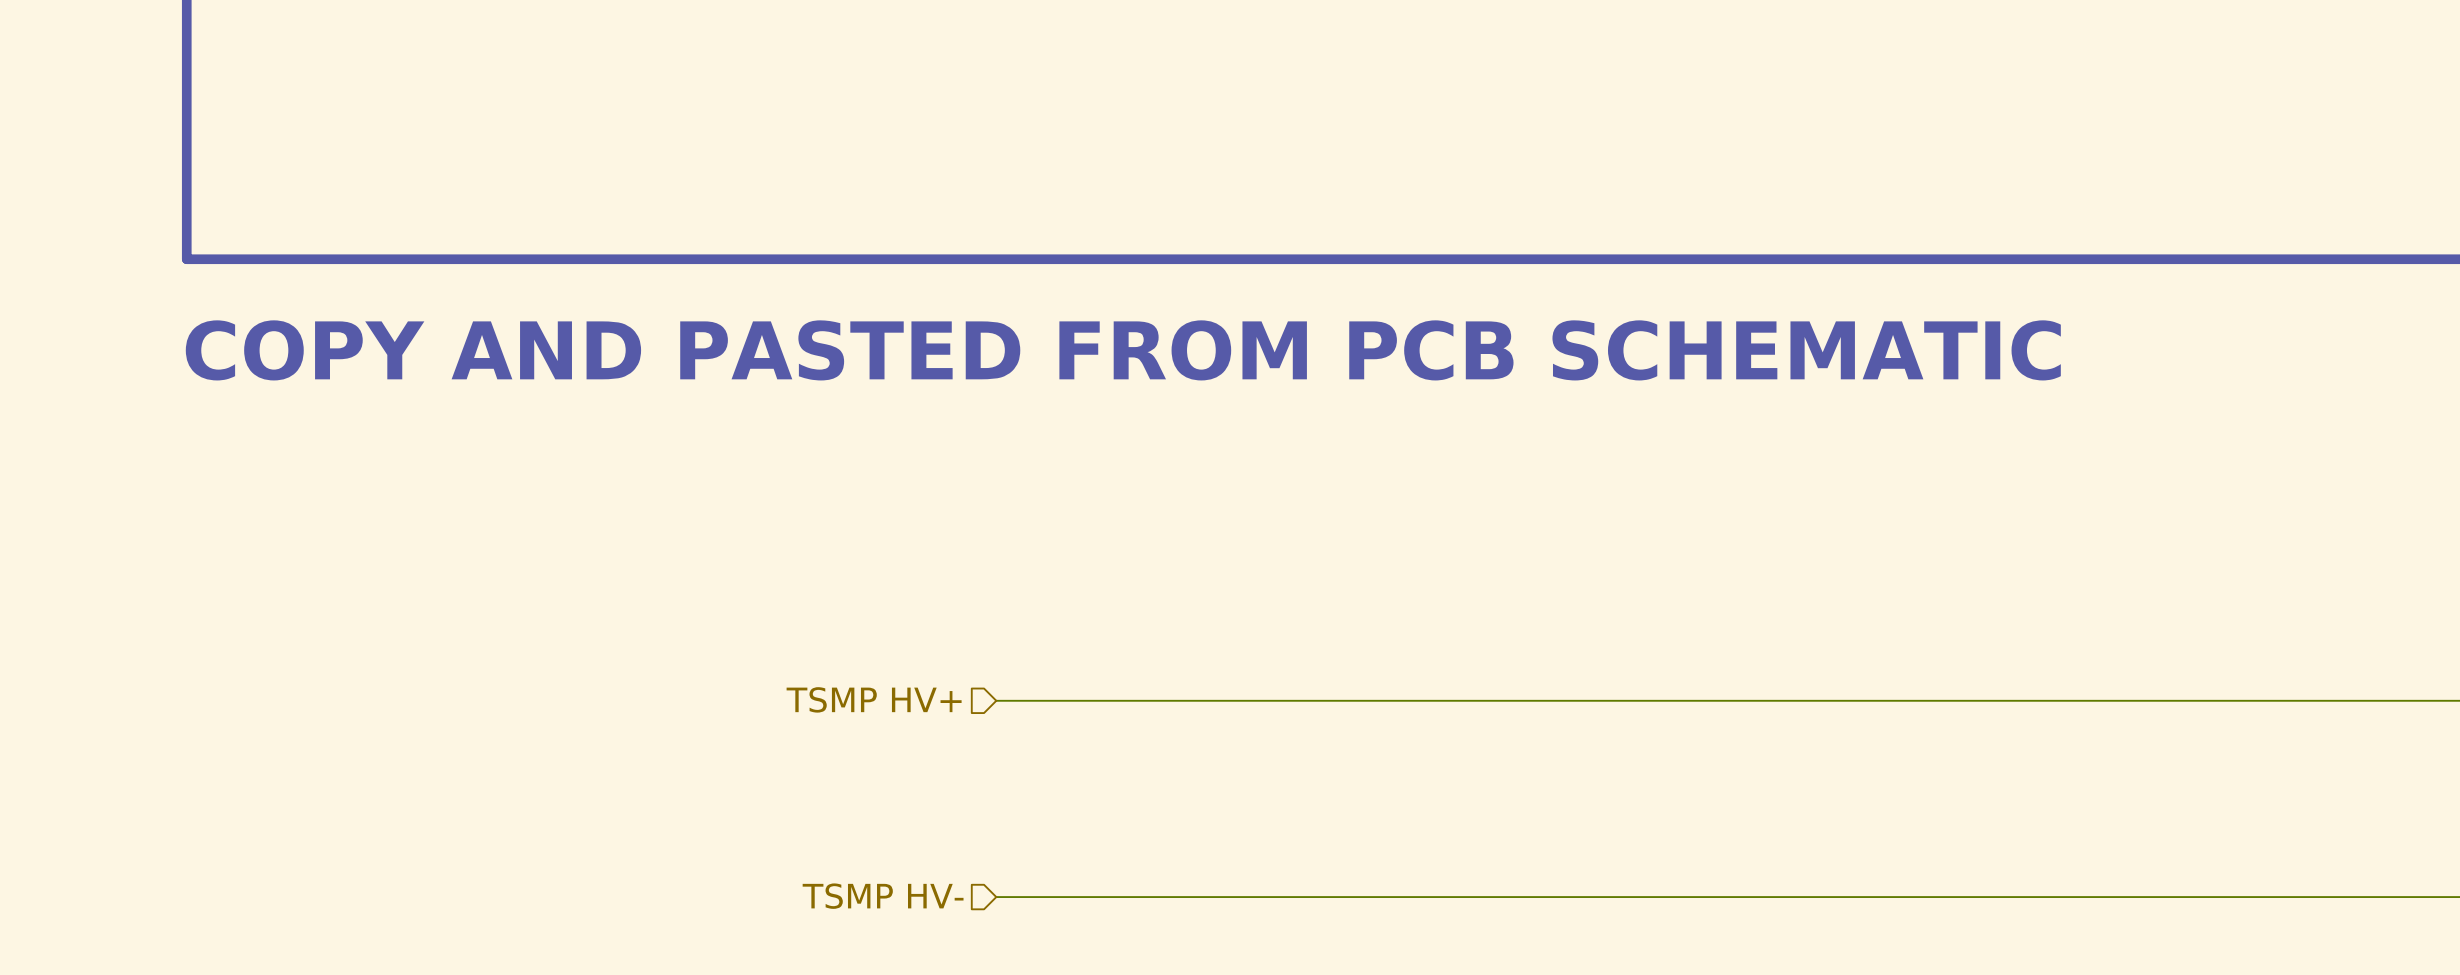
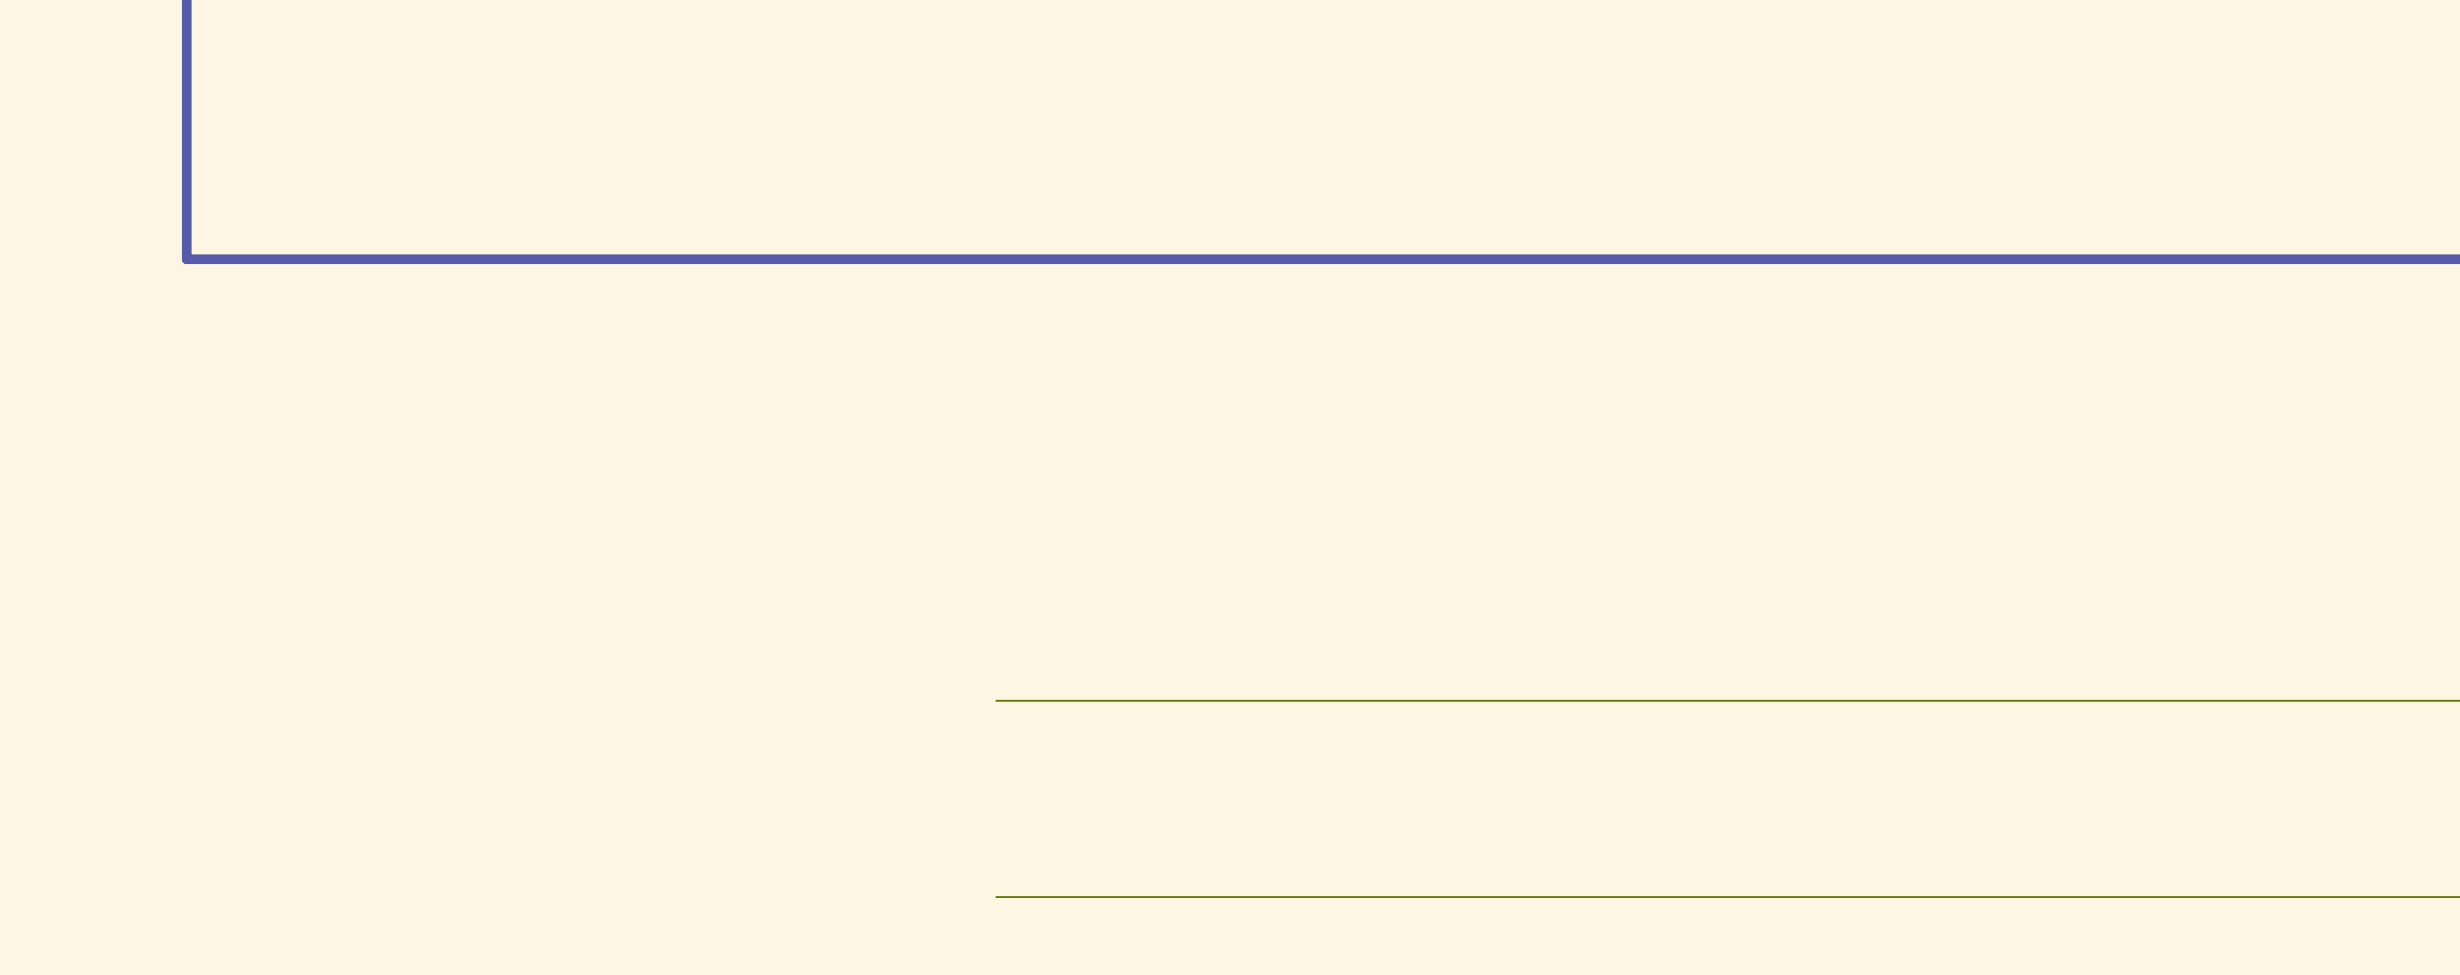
text: COPY AND PASTED FROM PCB SCHEMATIC (1123, 350) -> none
hierarchical label: TSMP HV+ (874, 699) -> none
hierarchical label: TSMP HV- (883, 896) -> none

